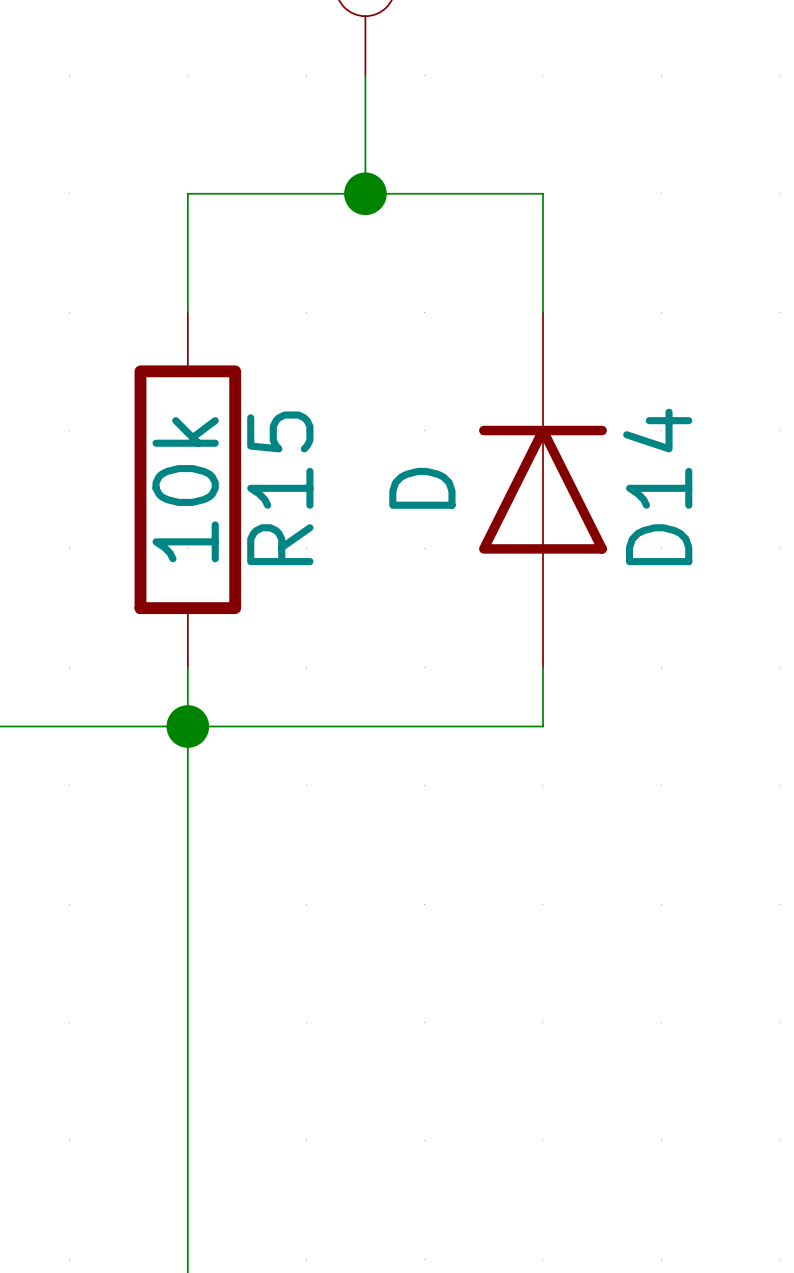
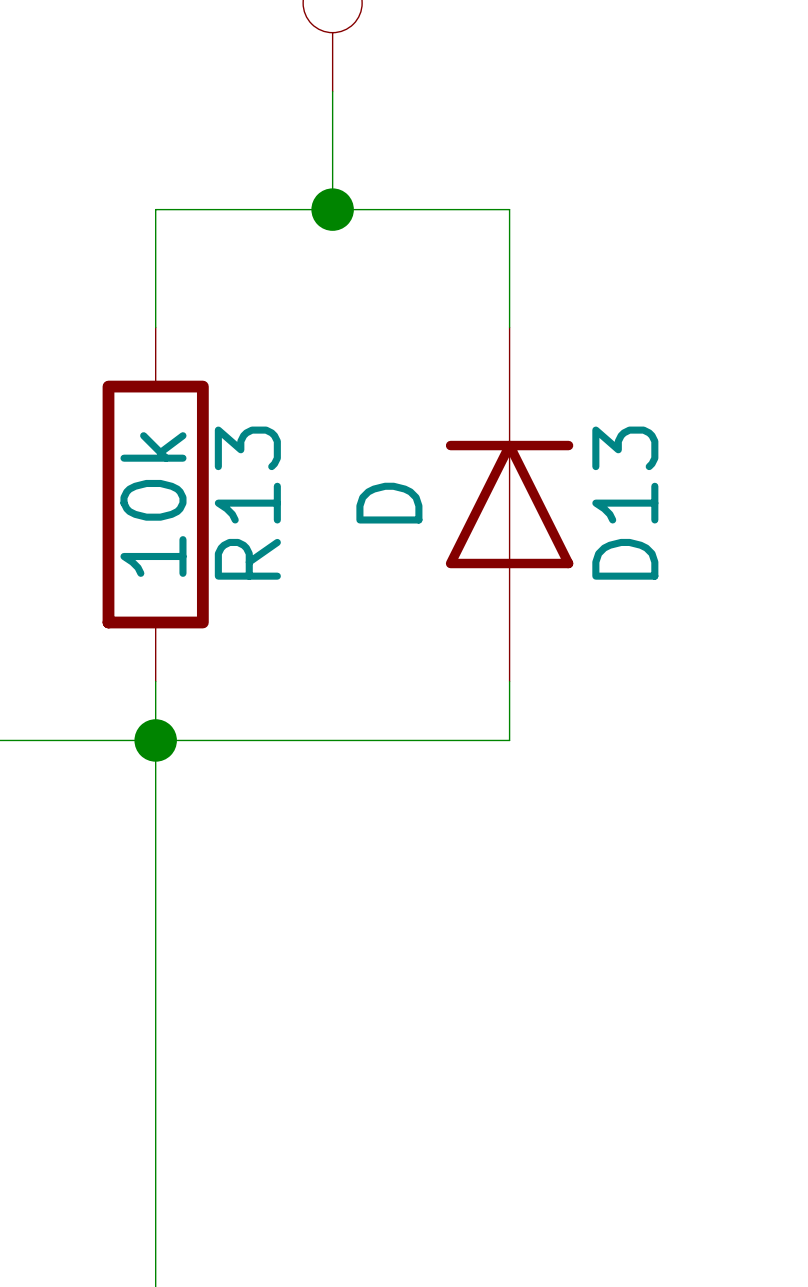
D14 name: D14 (657, 486) -> D13 (625, 503)
R15 name: R15 (280, 488) -> R13 (247, 503)

